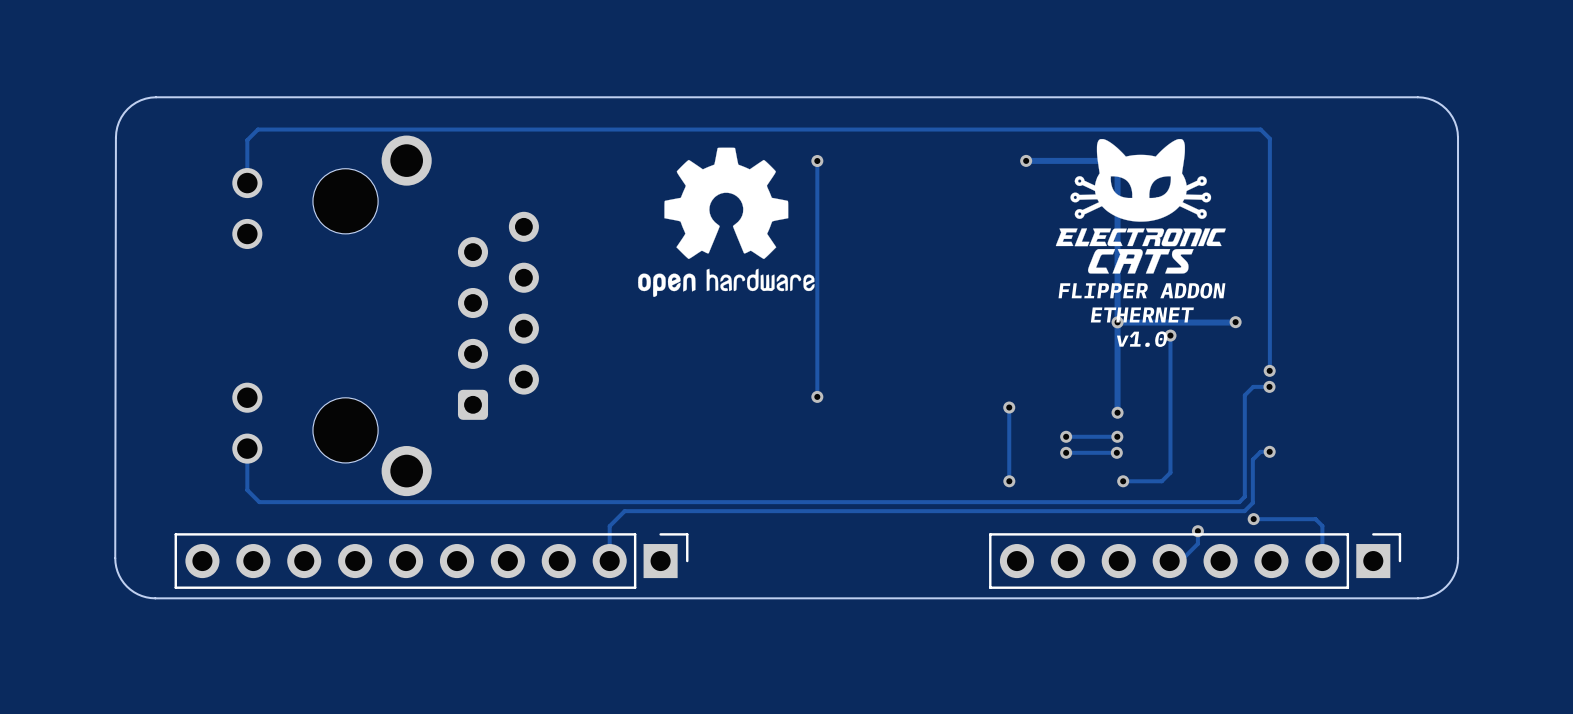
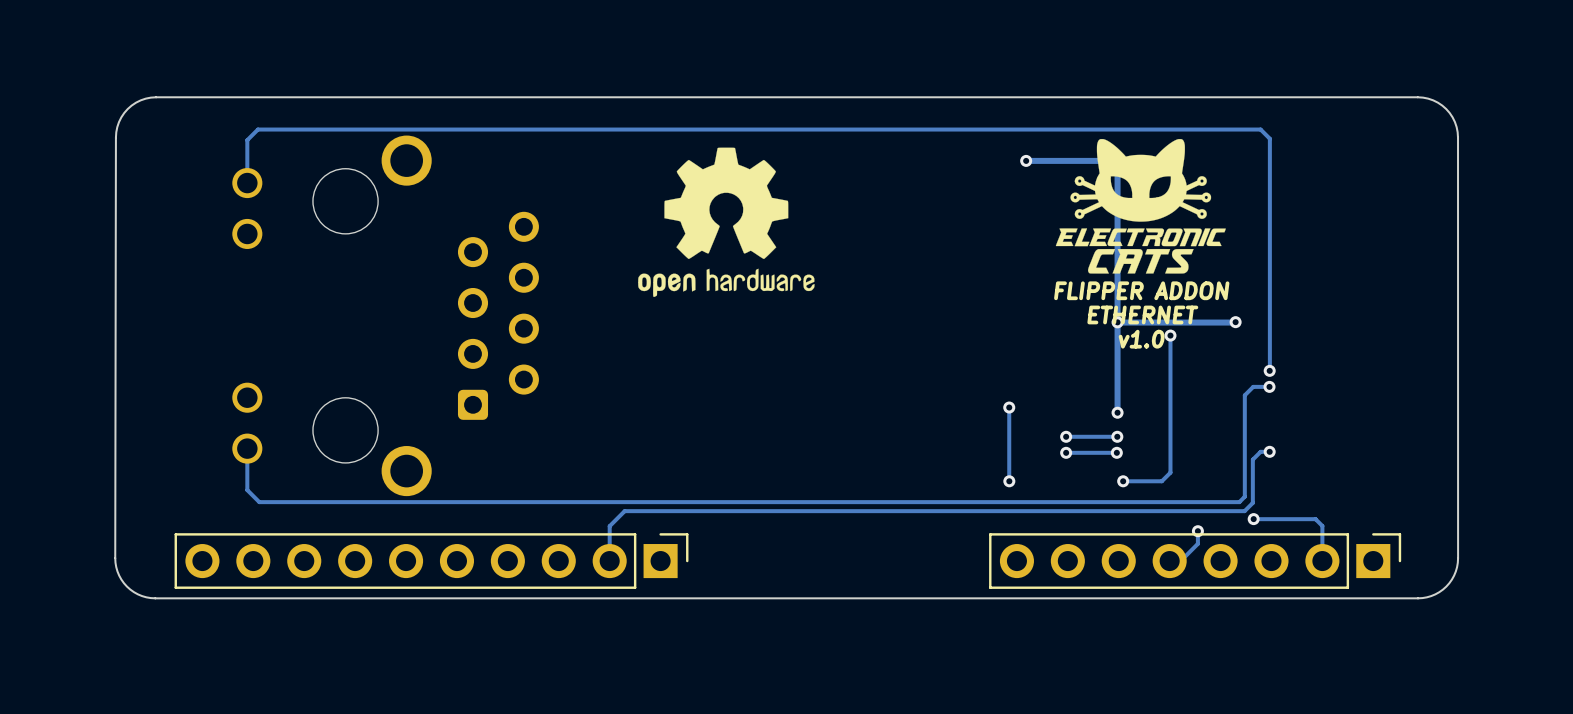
track: (817, 161) (817, 396) -> none
via: (817, 161) -> none
via: (817, 396) -> none

